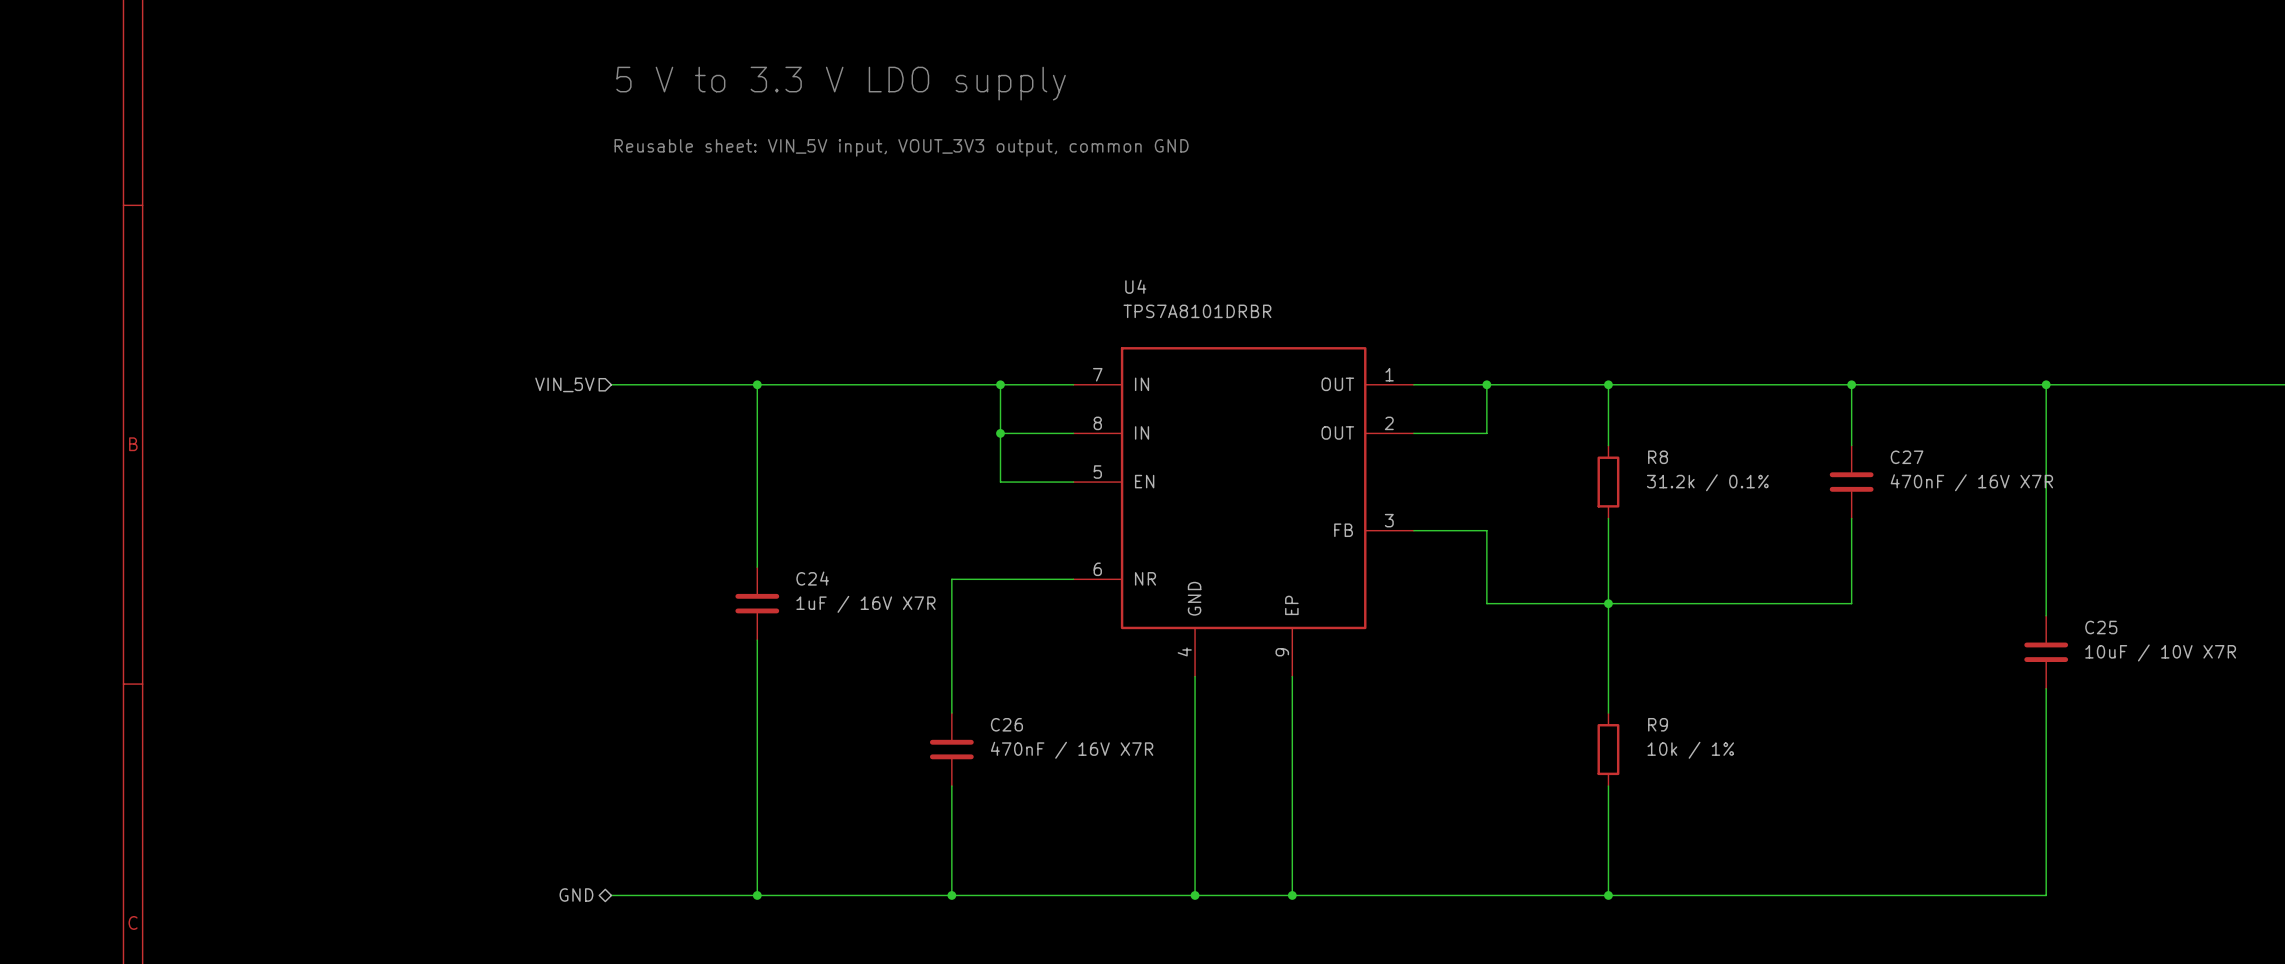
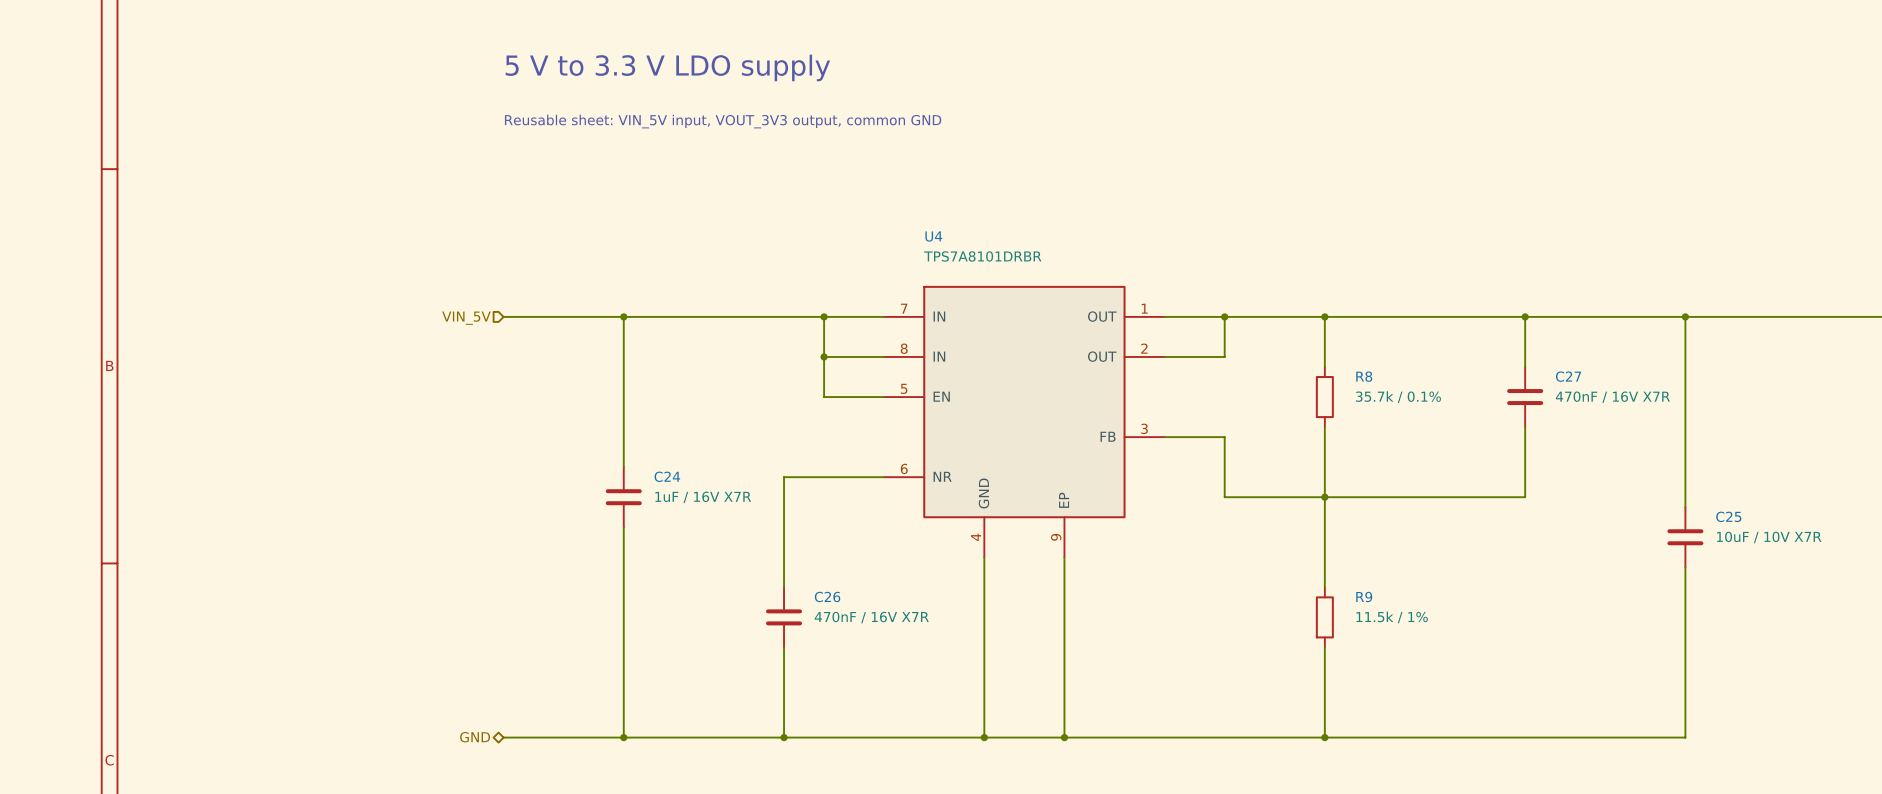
R8 value: 31.2k / 0.1% (1707, 482) -> 35.7k / 0.1% (1398, 397)
R9 value: 10k / 1% (1690, 750) -> 11.5k / 1% (1392, 617)

